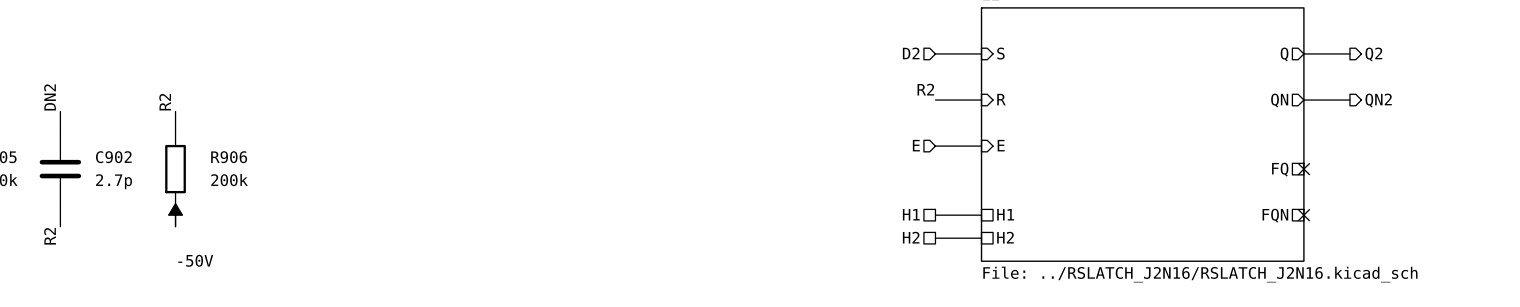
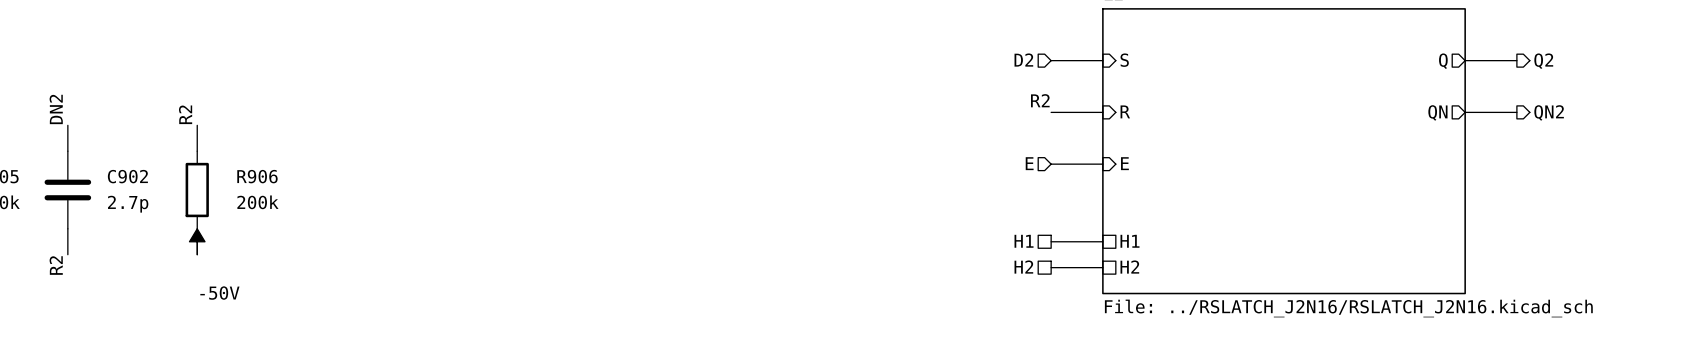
sheet pin: FQ (1280, 169) -> none
no-connect mark: (1303, 169) -> none
sheet pin: FQN (1275, 215) -> none
no-connect mark: (1303, 215) -> none

